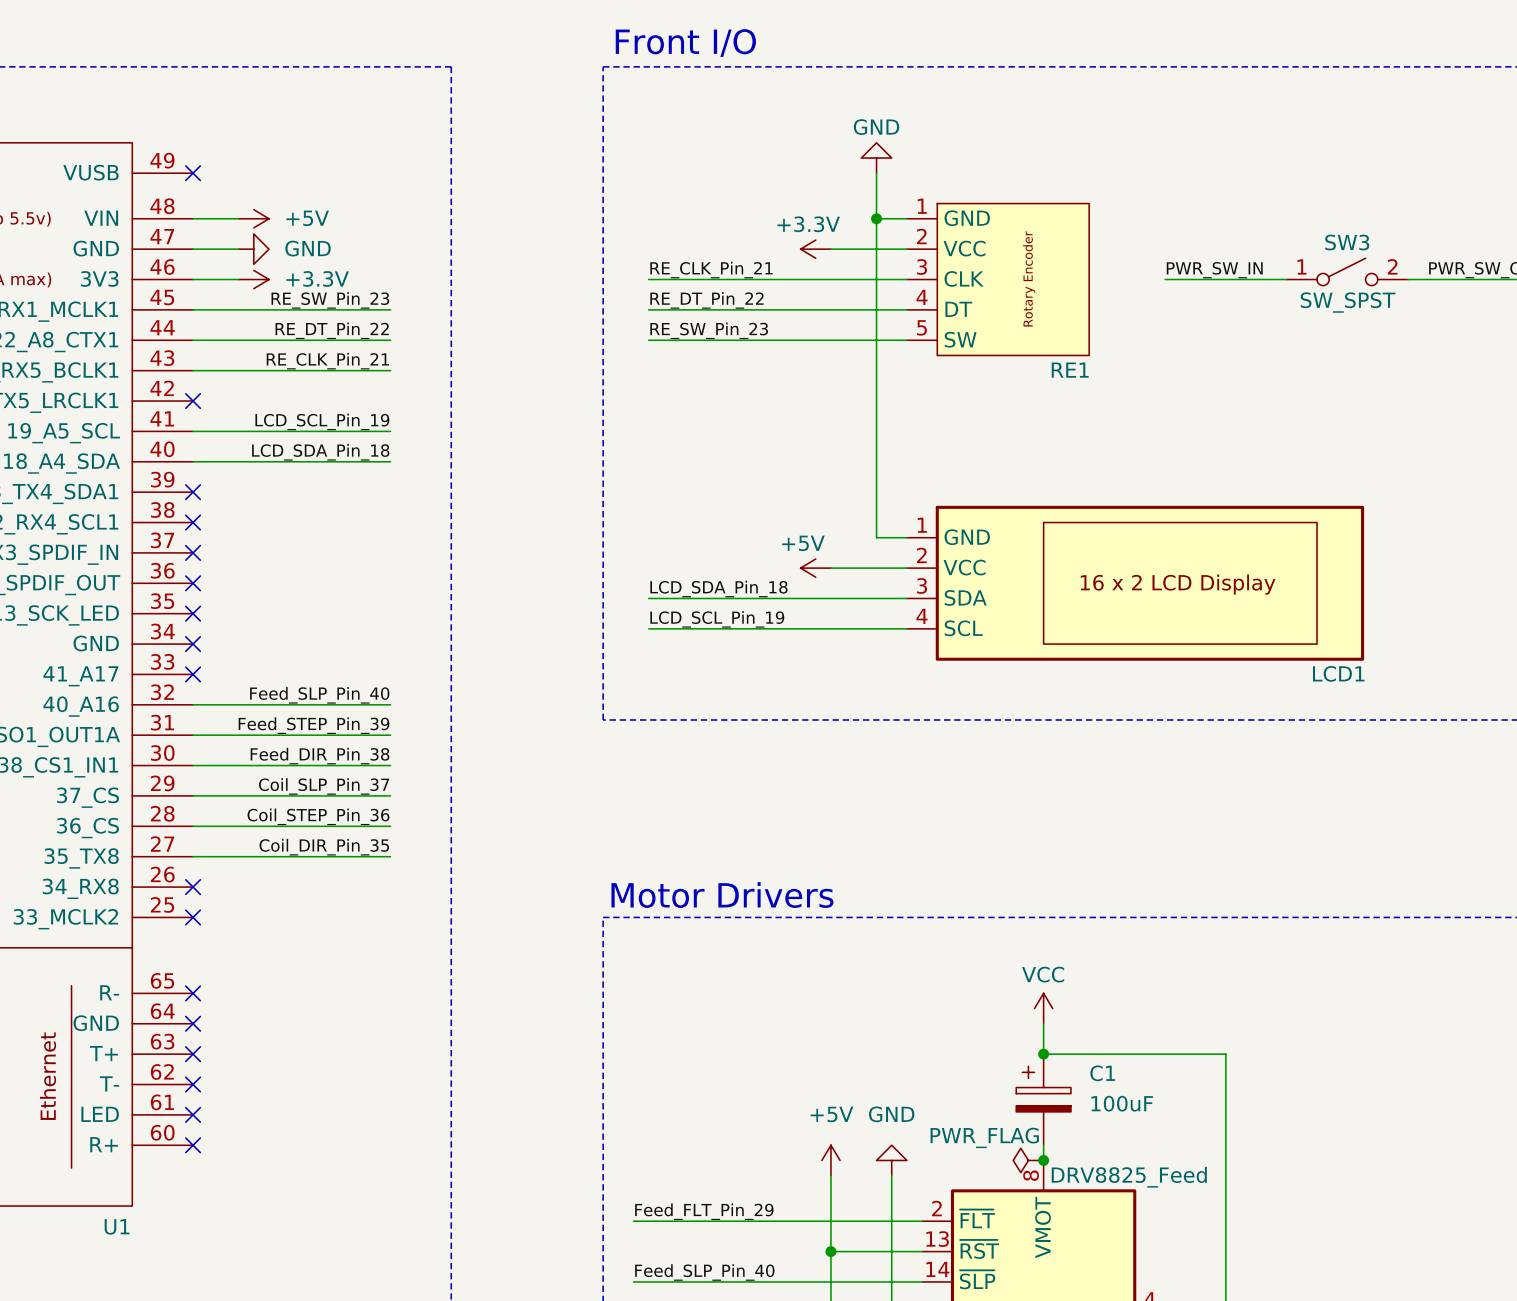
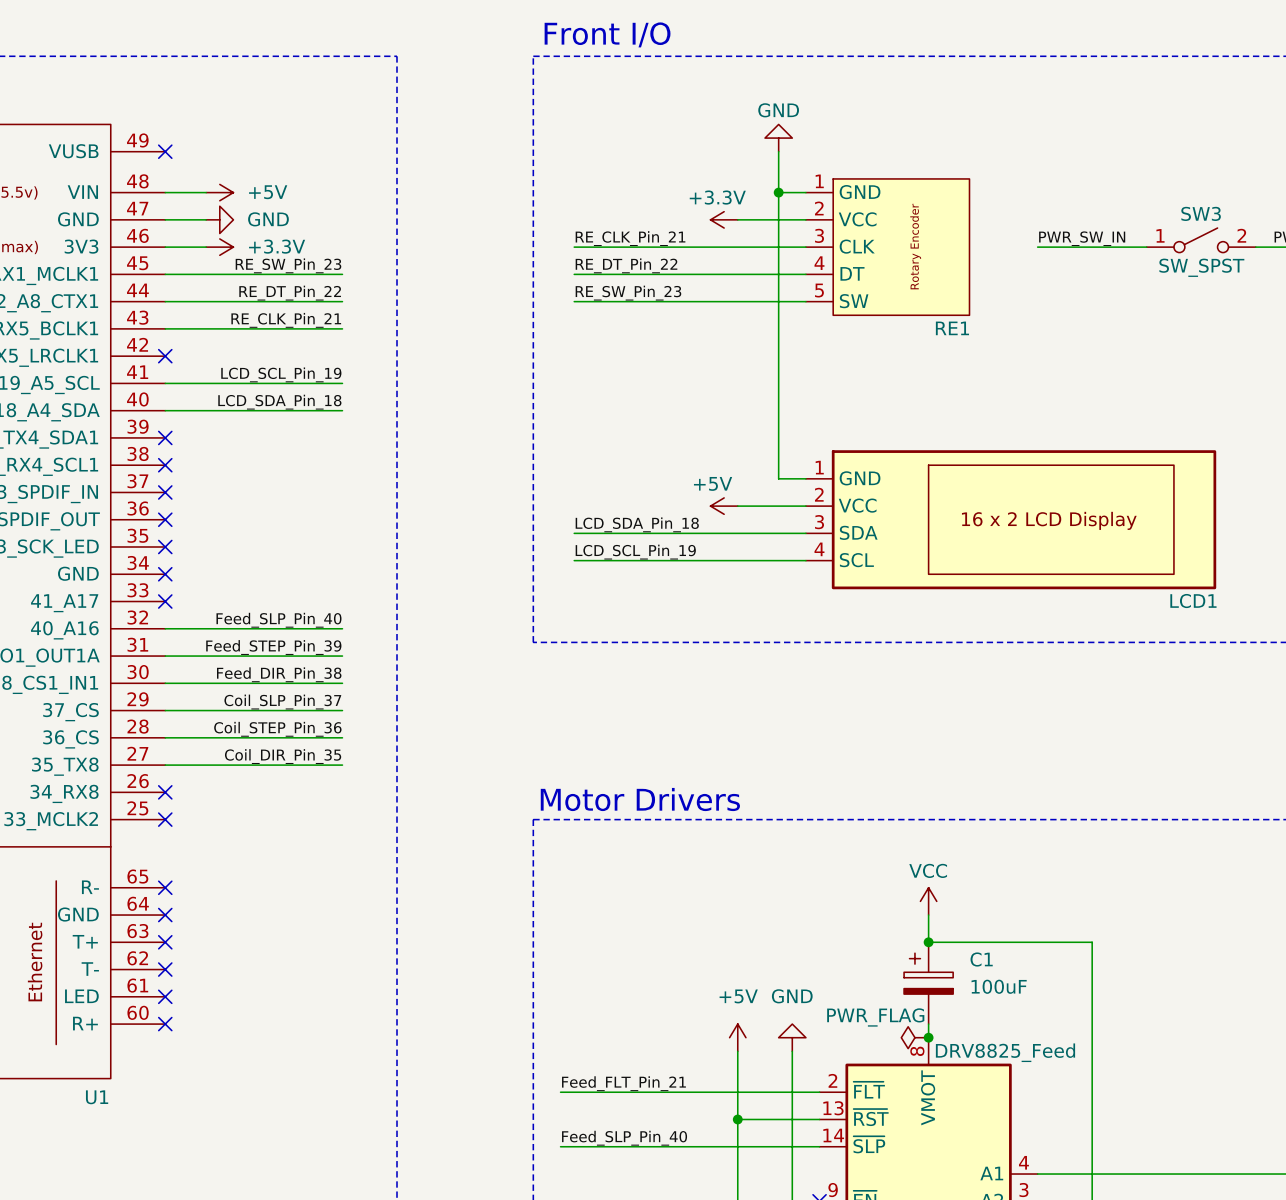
label: Feed_FLT_Pin_29 (704, 1211) -> Feed_FLT_Pin_21 (623, 1083)

